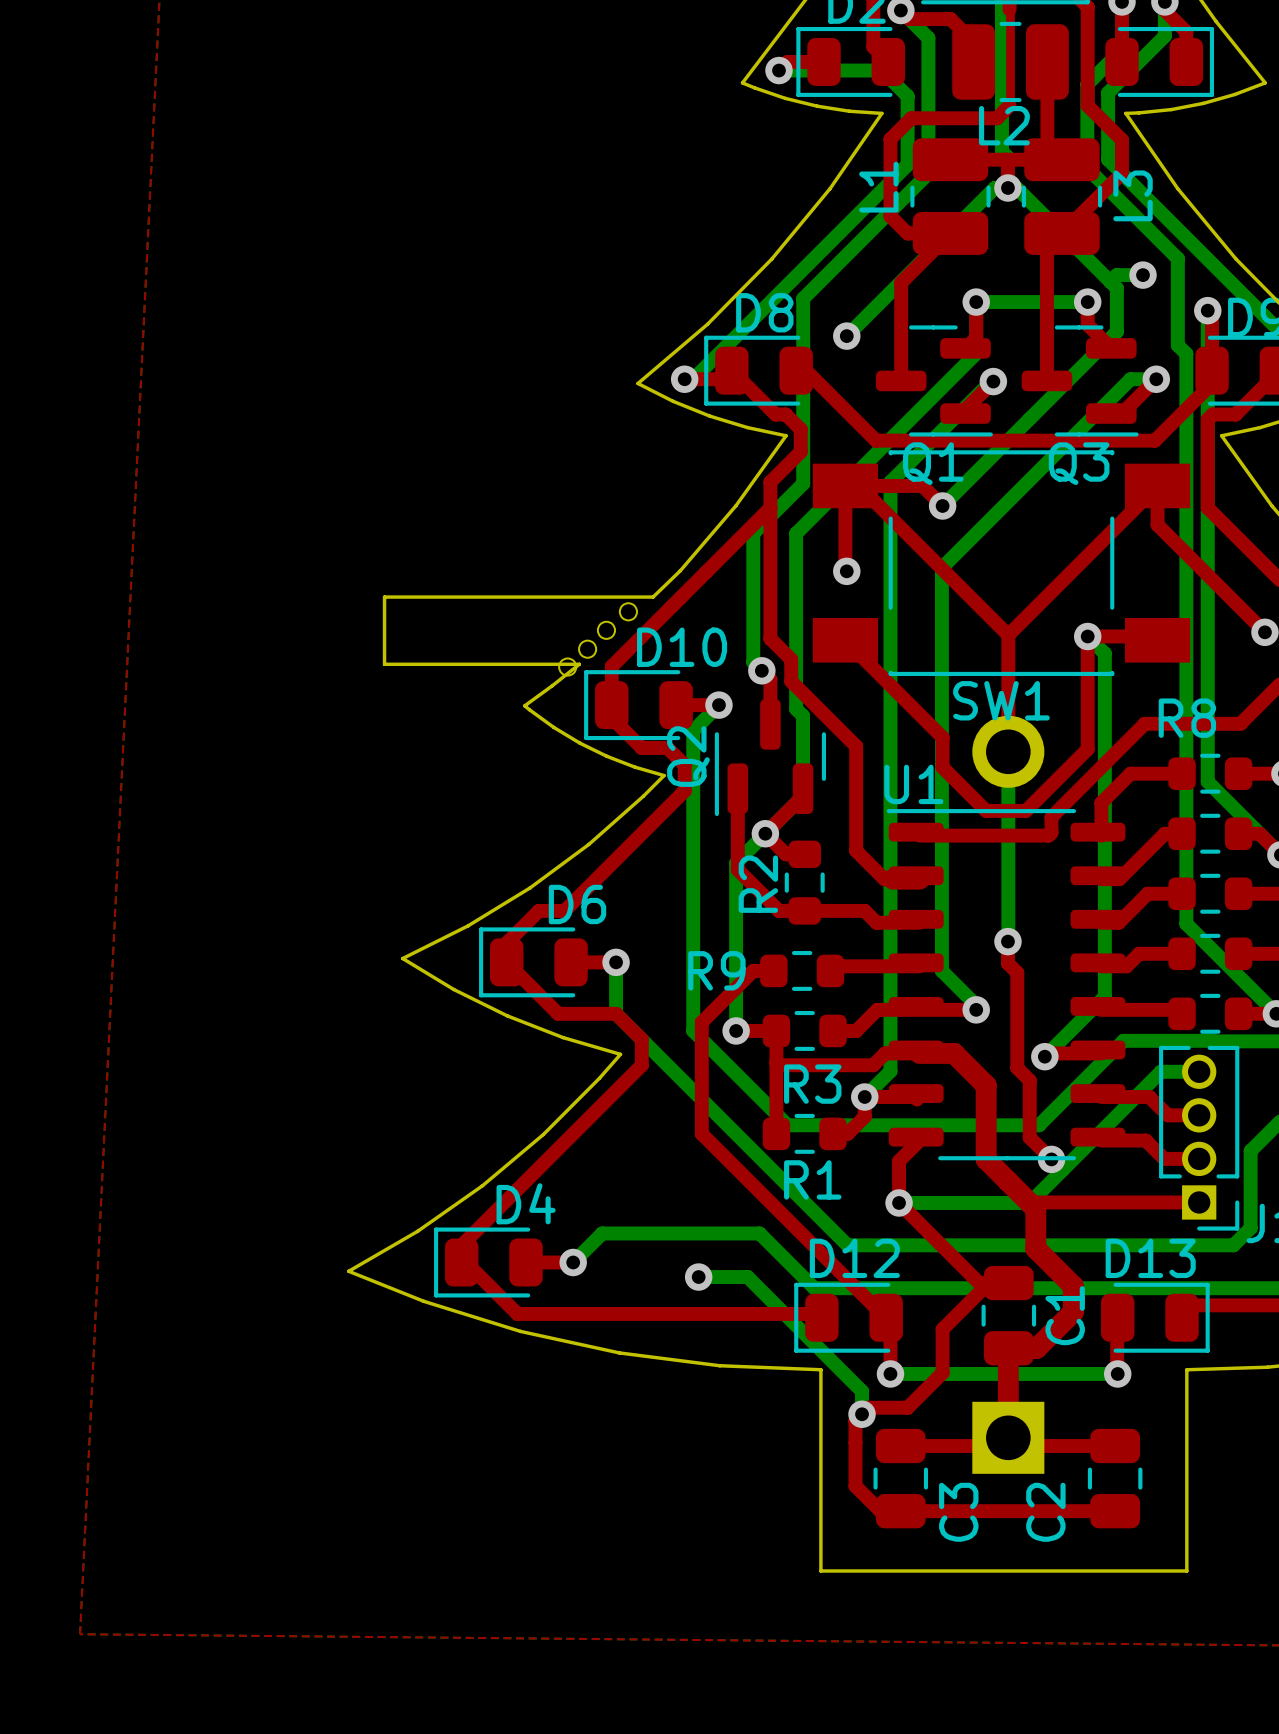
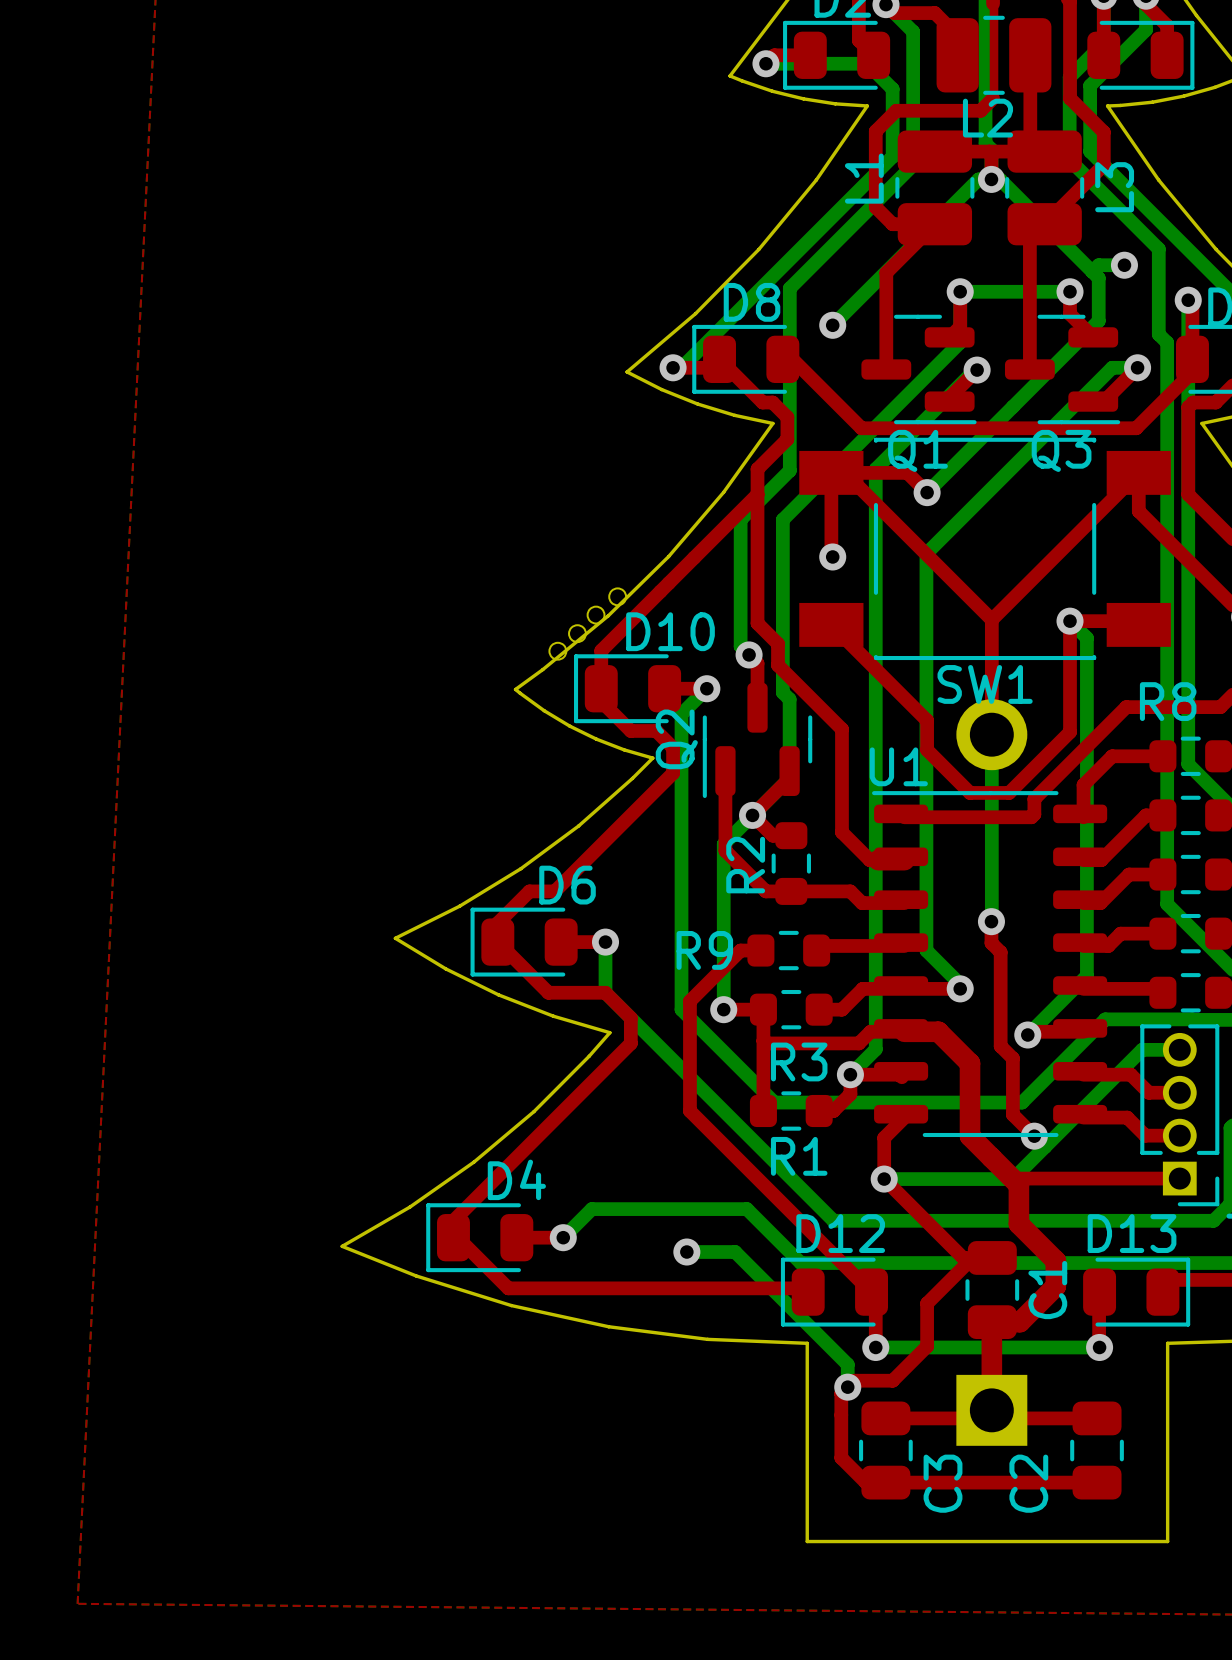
board edge: (680, 570) (653, 597) (384, 597) (384, 664) (579, 664) (552, 685) -> (668, 556) (608, 615) (542, 669)

